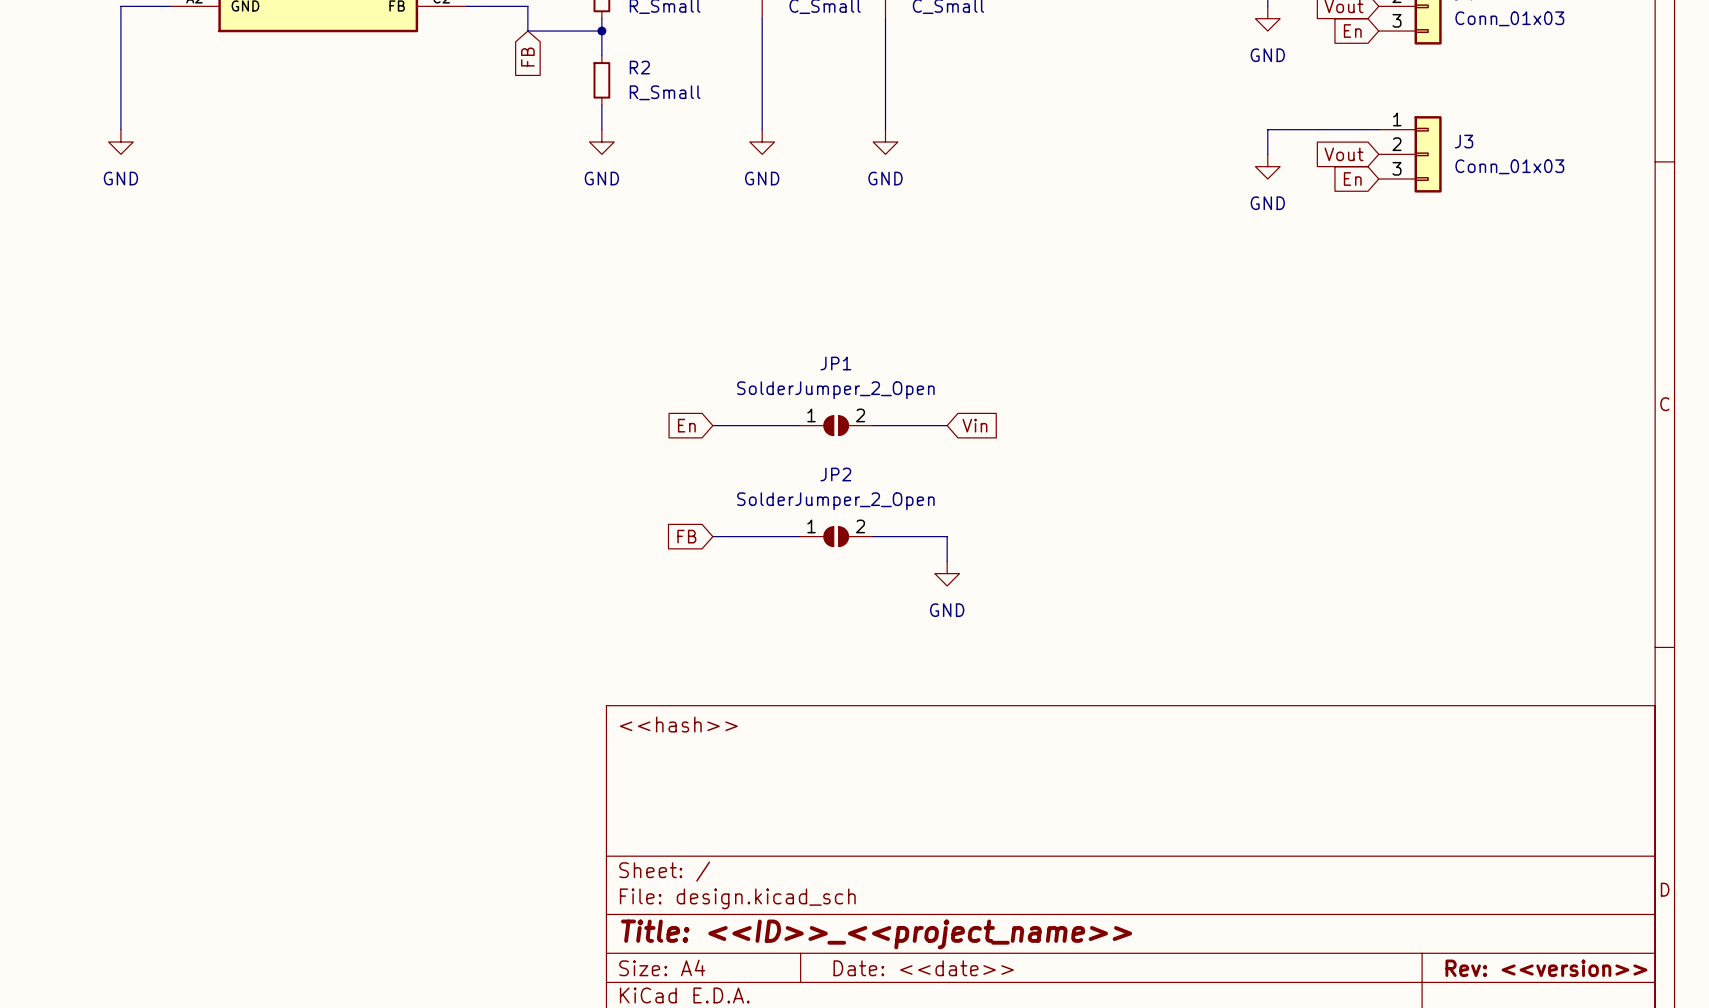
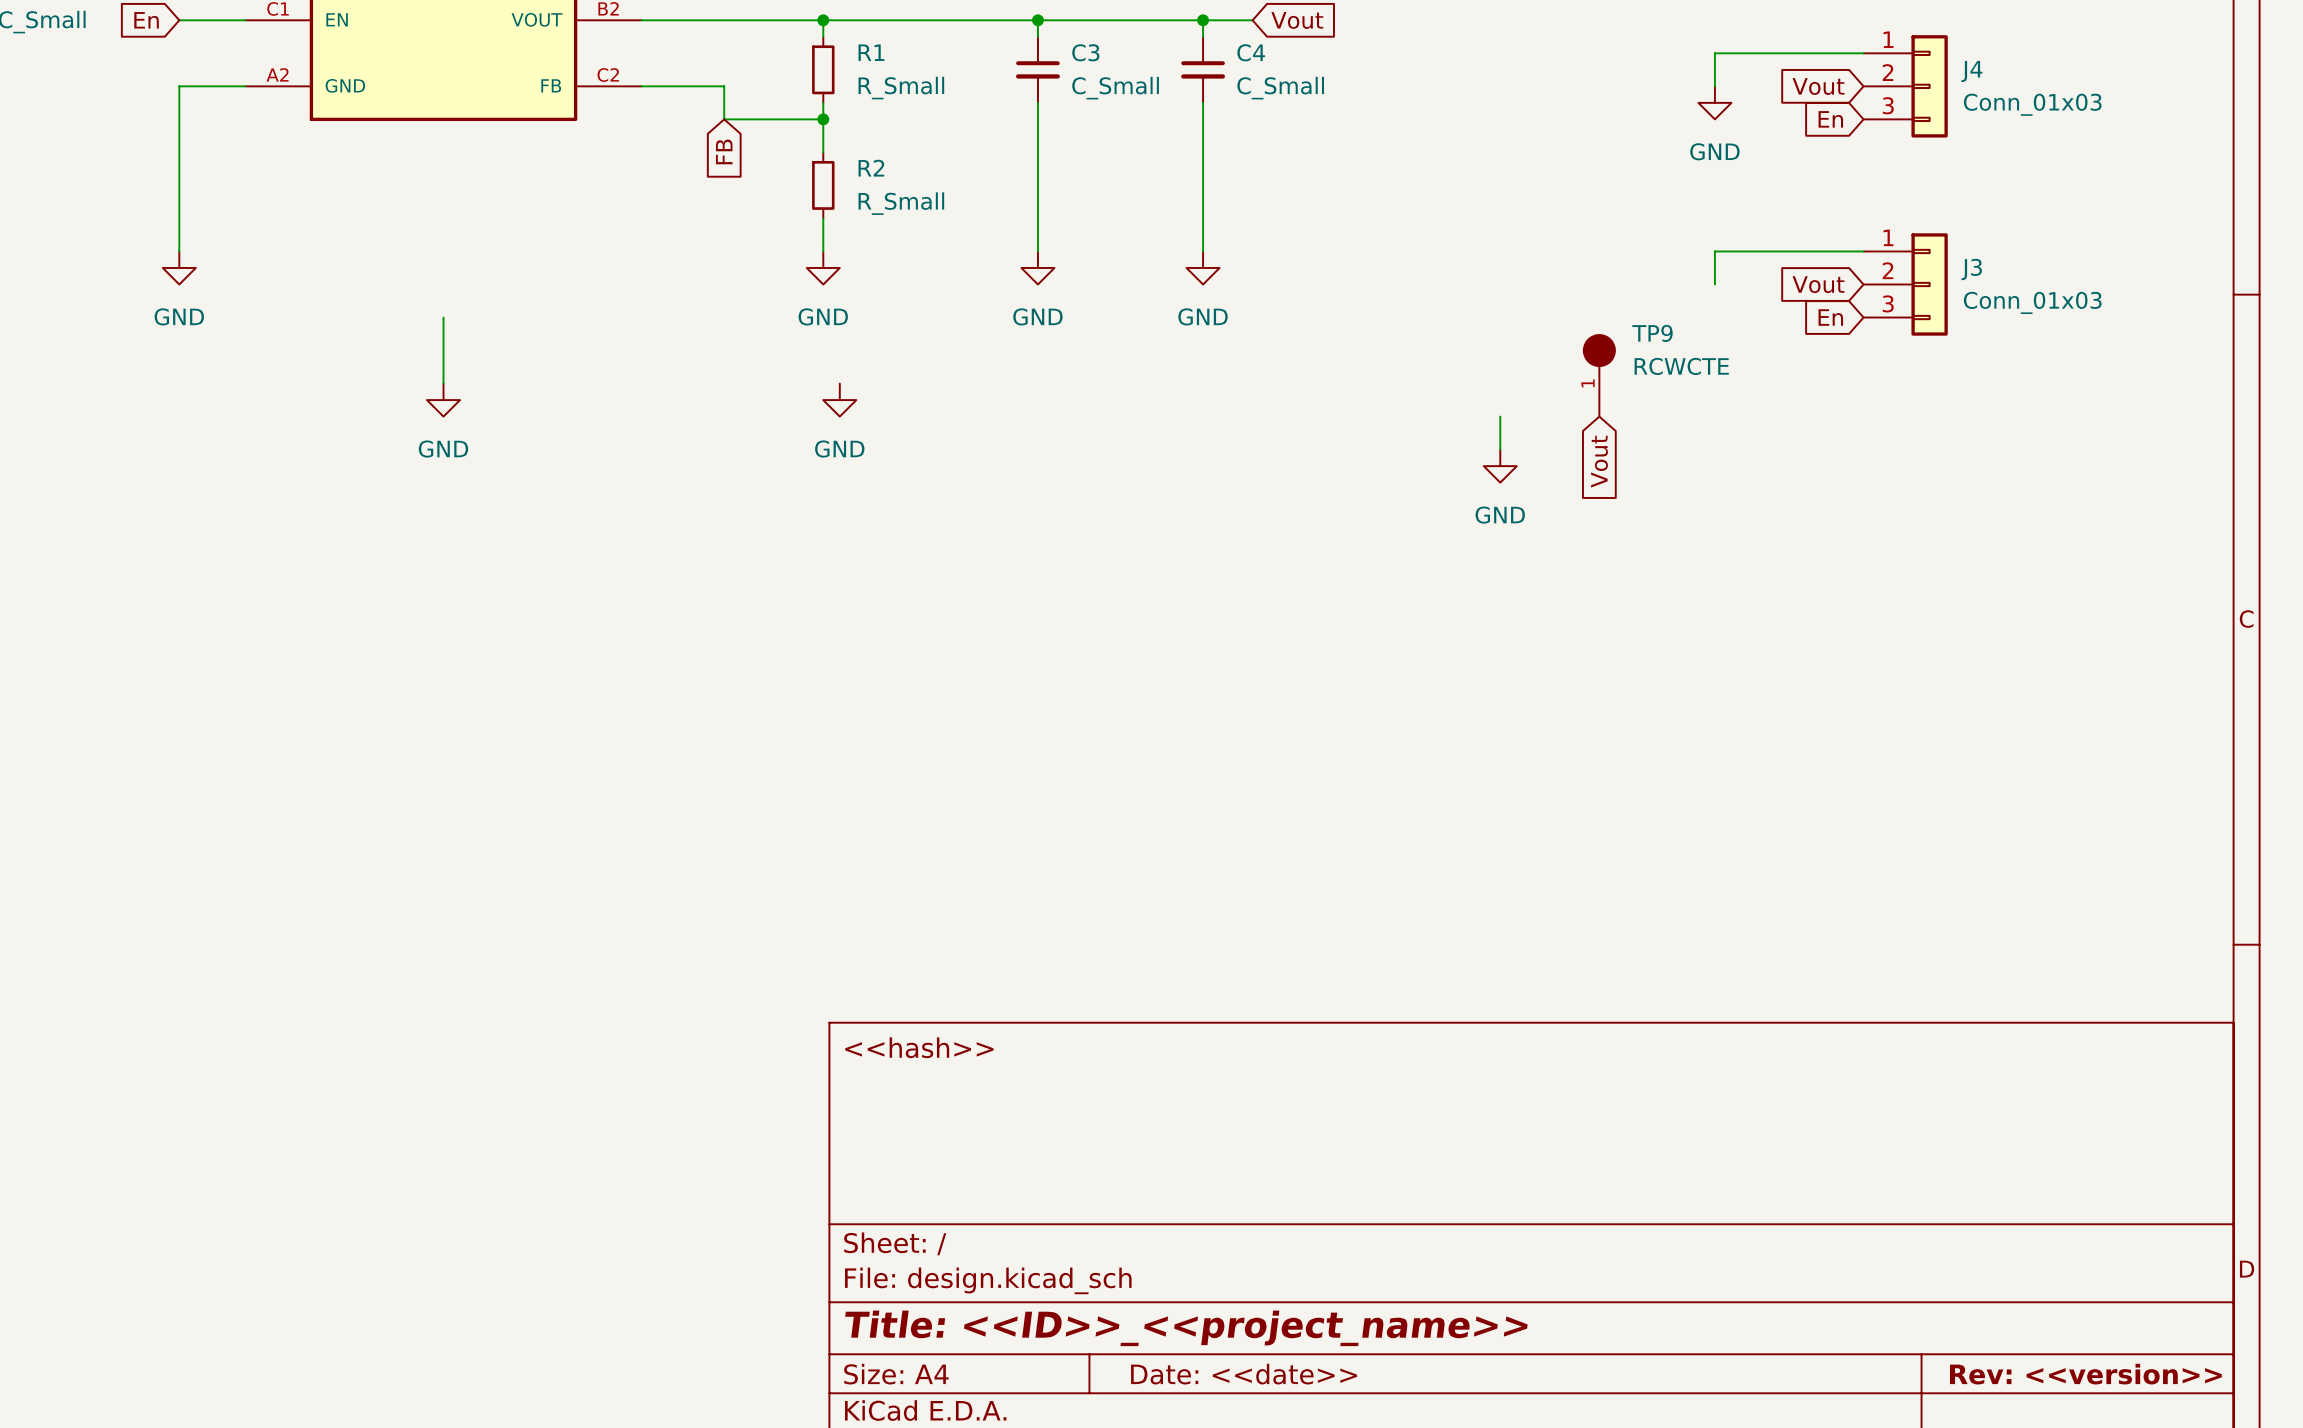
power symbol: GND (1267, 166) -> none
wire: none -> (443, 317) (443, 383)
TP9: none -> RCWCTE (1599, 375)
power symbol: none -> GND (443, 400)
power symbol: none -> GND (839, 400)
wire: none -> (1500, 416) (1500, 449)
global label: none -> Vout (1599, 461)
power symbol: none -> GND (1500, 466)
global label: En (686, 425) -> none
wire: (712, 425) (799, 425) -> none
JP1: SolderJumper_2_Open (836, 425) -> none
wire: (873, 425) (947, 425) -> none
global label: Vin (974, 425) -> none
global label: FB (686, 536) -> none
wire: (712, 536) (799, 536) -> none
JP2: SolderJumper_2_Open (836, 536) -> none
wire: (873, 536) (947, 536) (947, 561) -> none
power symbol: GND (947, 573) -> none

